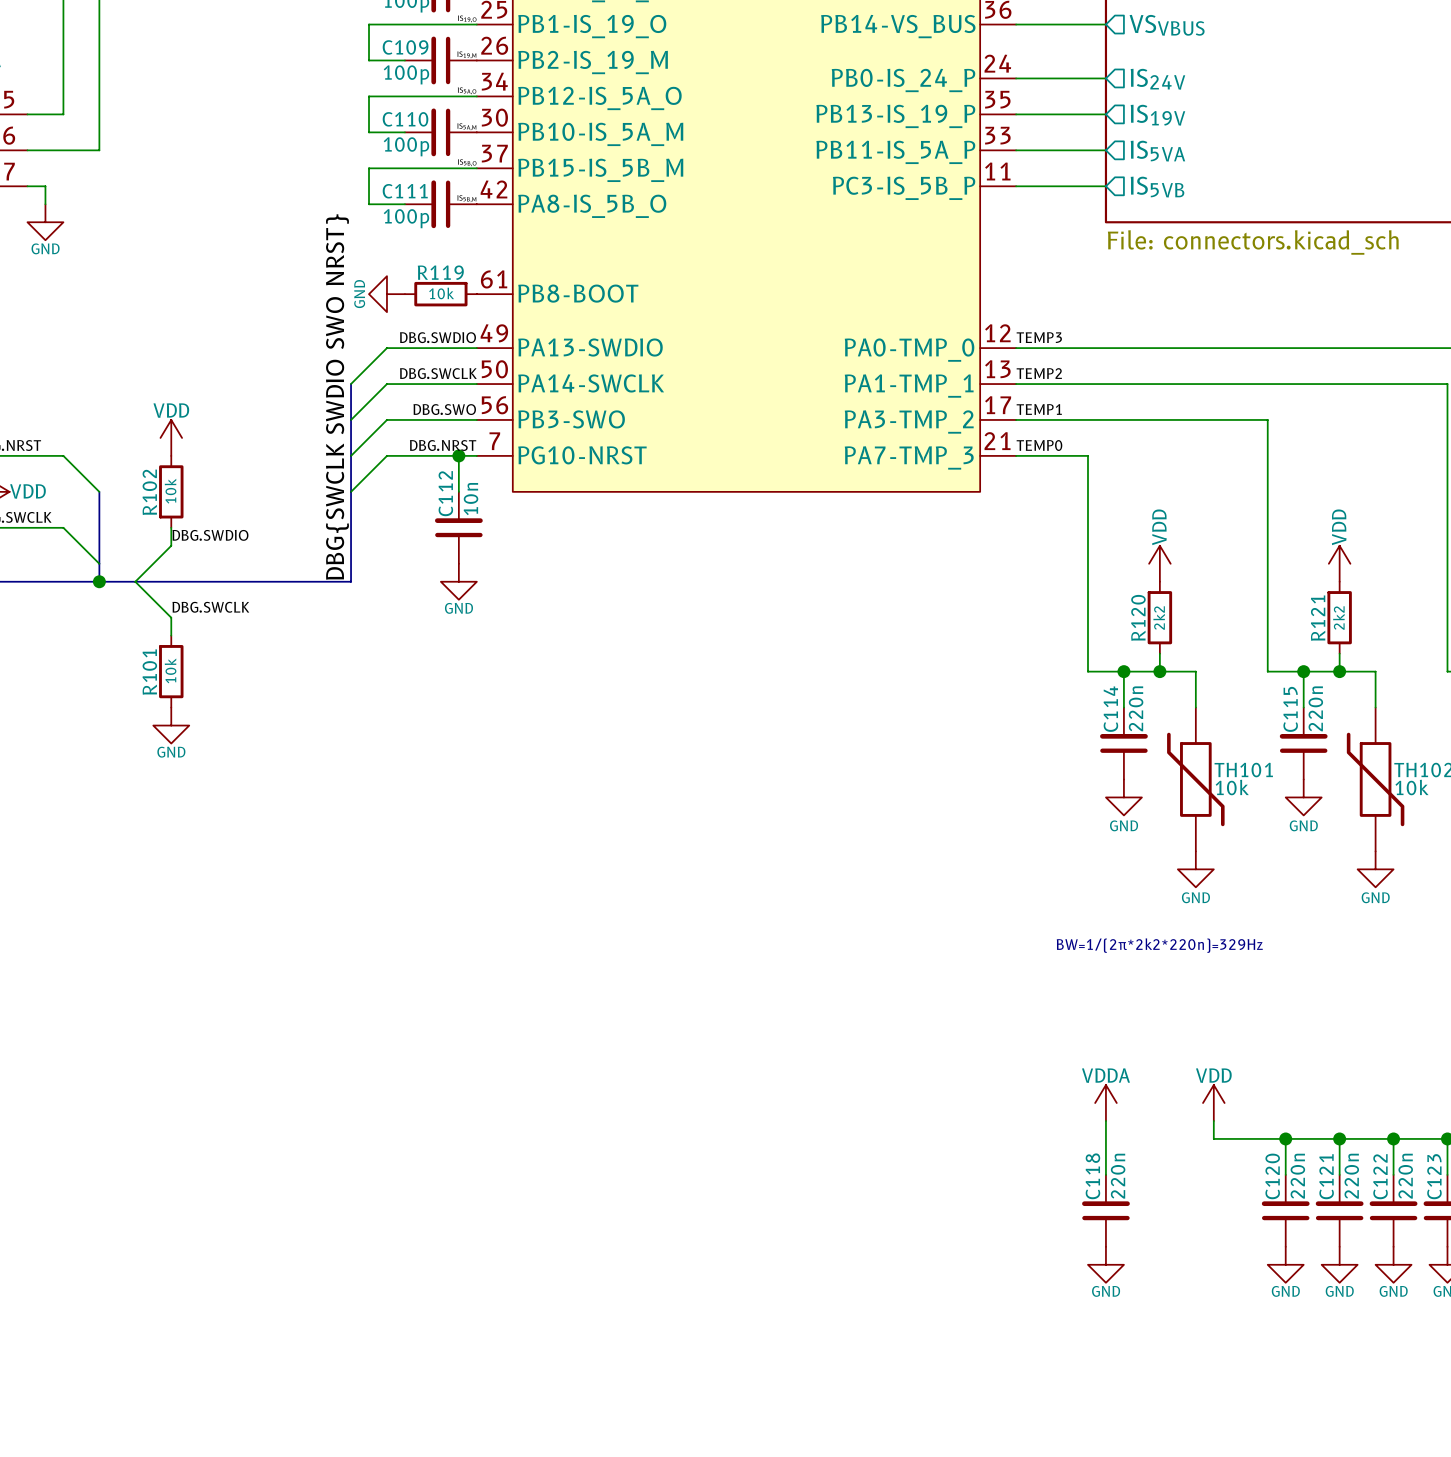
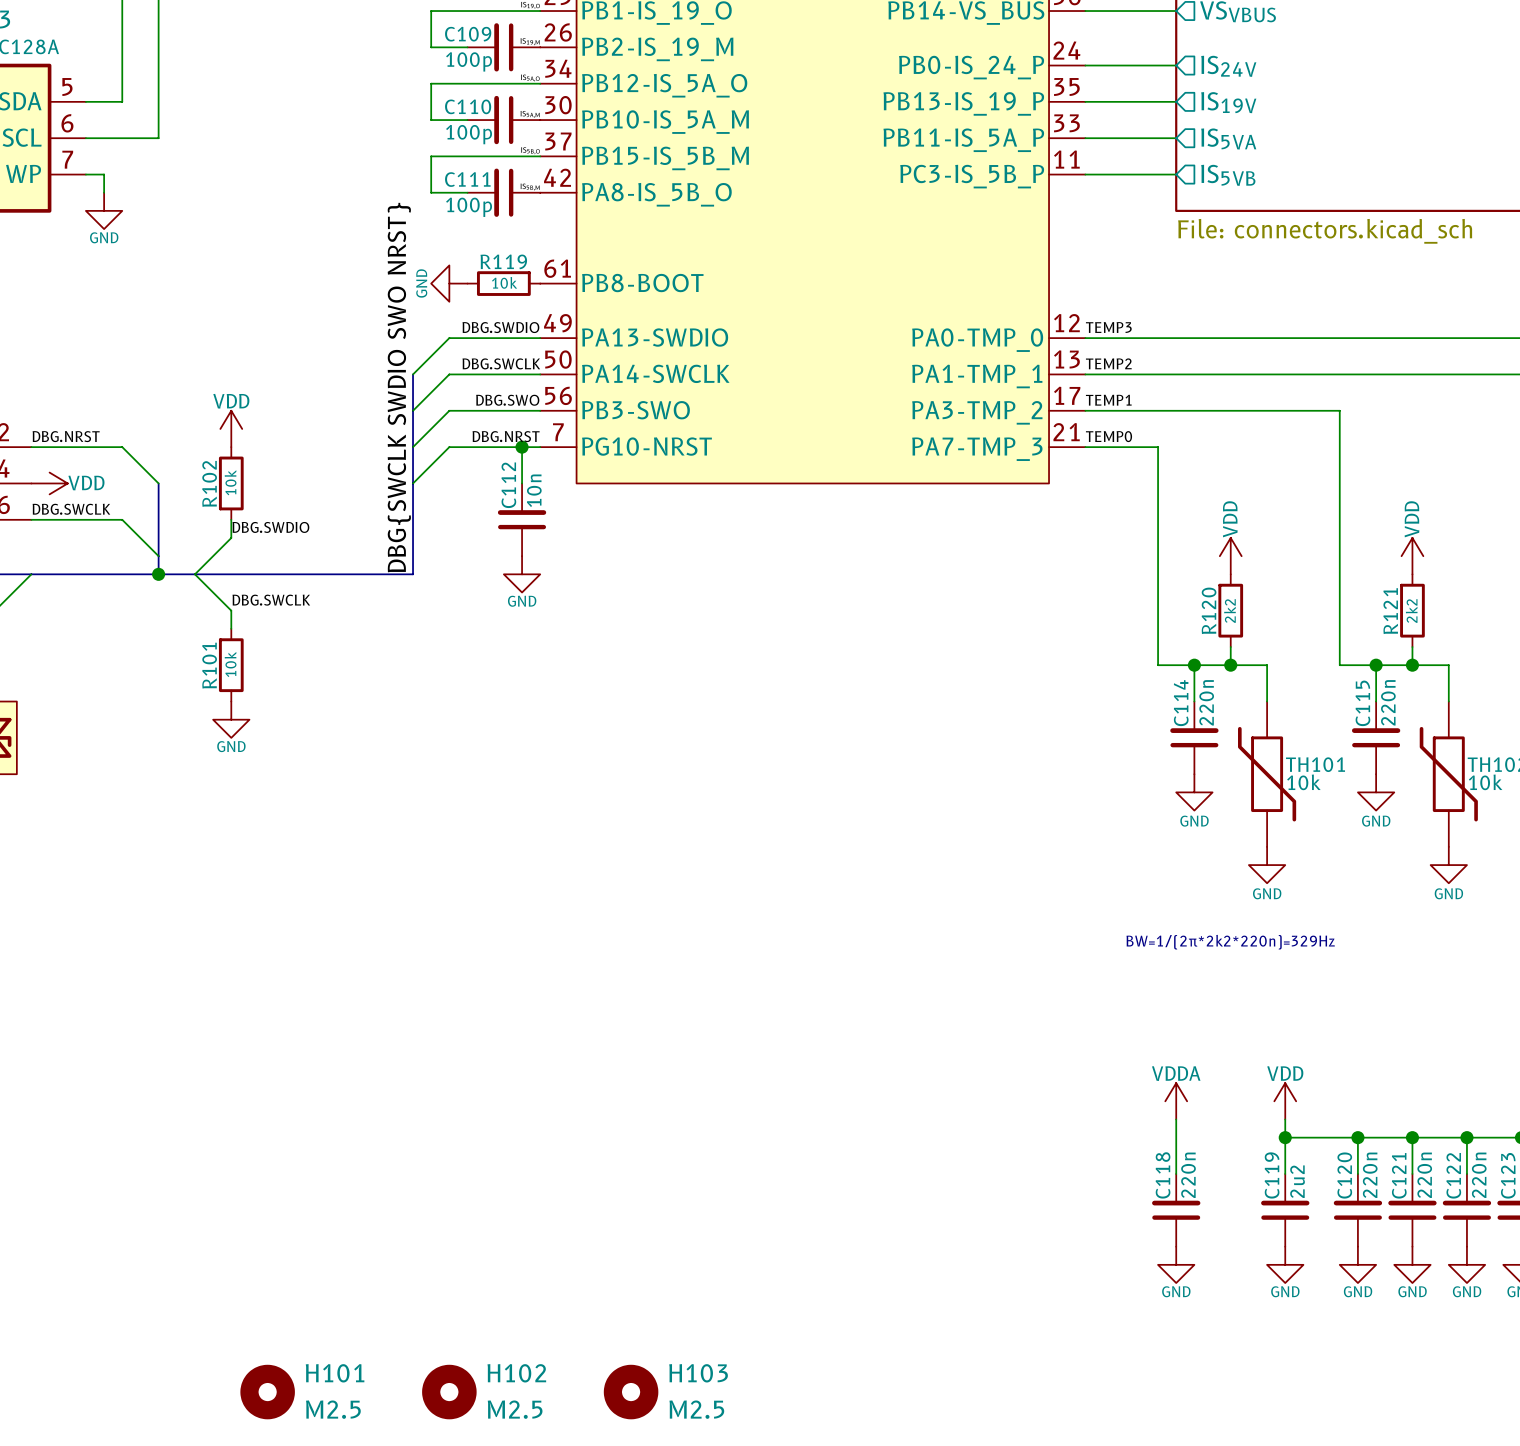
wire: none -> (1285, 1137) (1285, 1173)
junction: none -> (1285, 1137)
C119: none -> 2u2 (1285, 1210)
power symbol: none -> GND (1285, 1264)
H101: none -> M2.5 (267, 1392)
H102: none -> M2.5 (449, 1392)
H103: none -> M2.5 (631, 1392)

